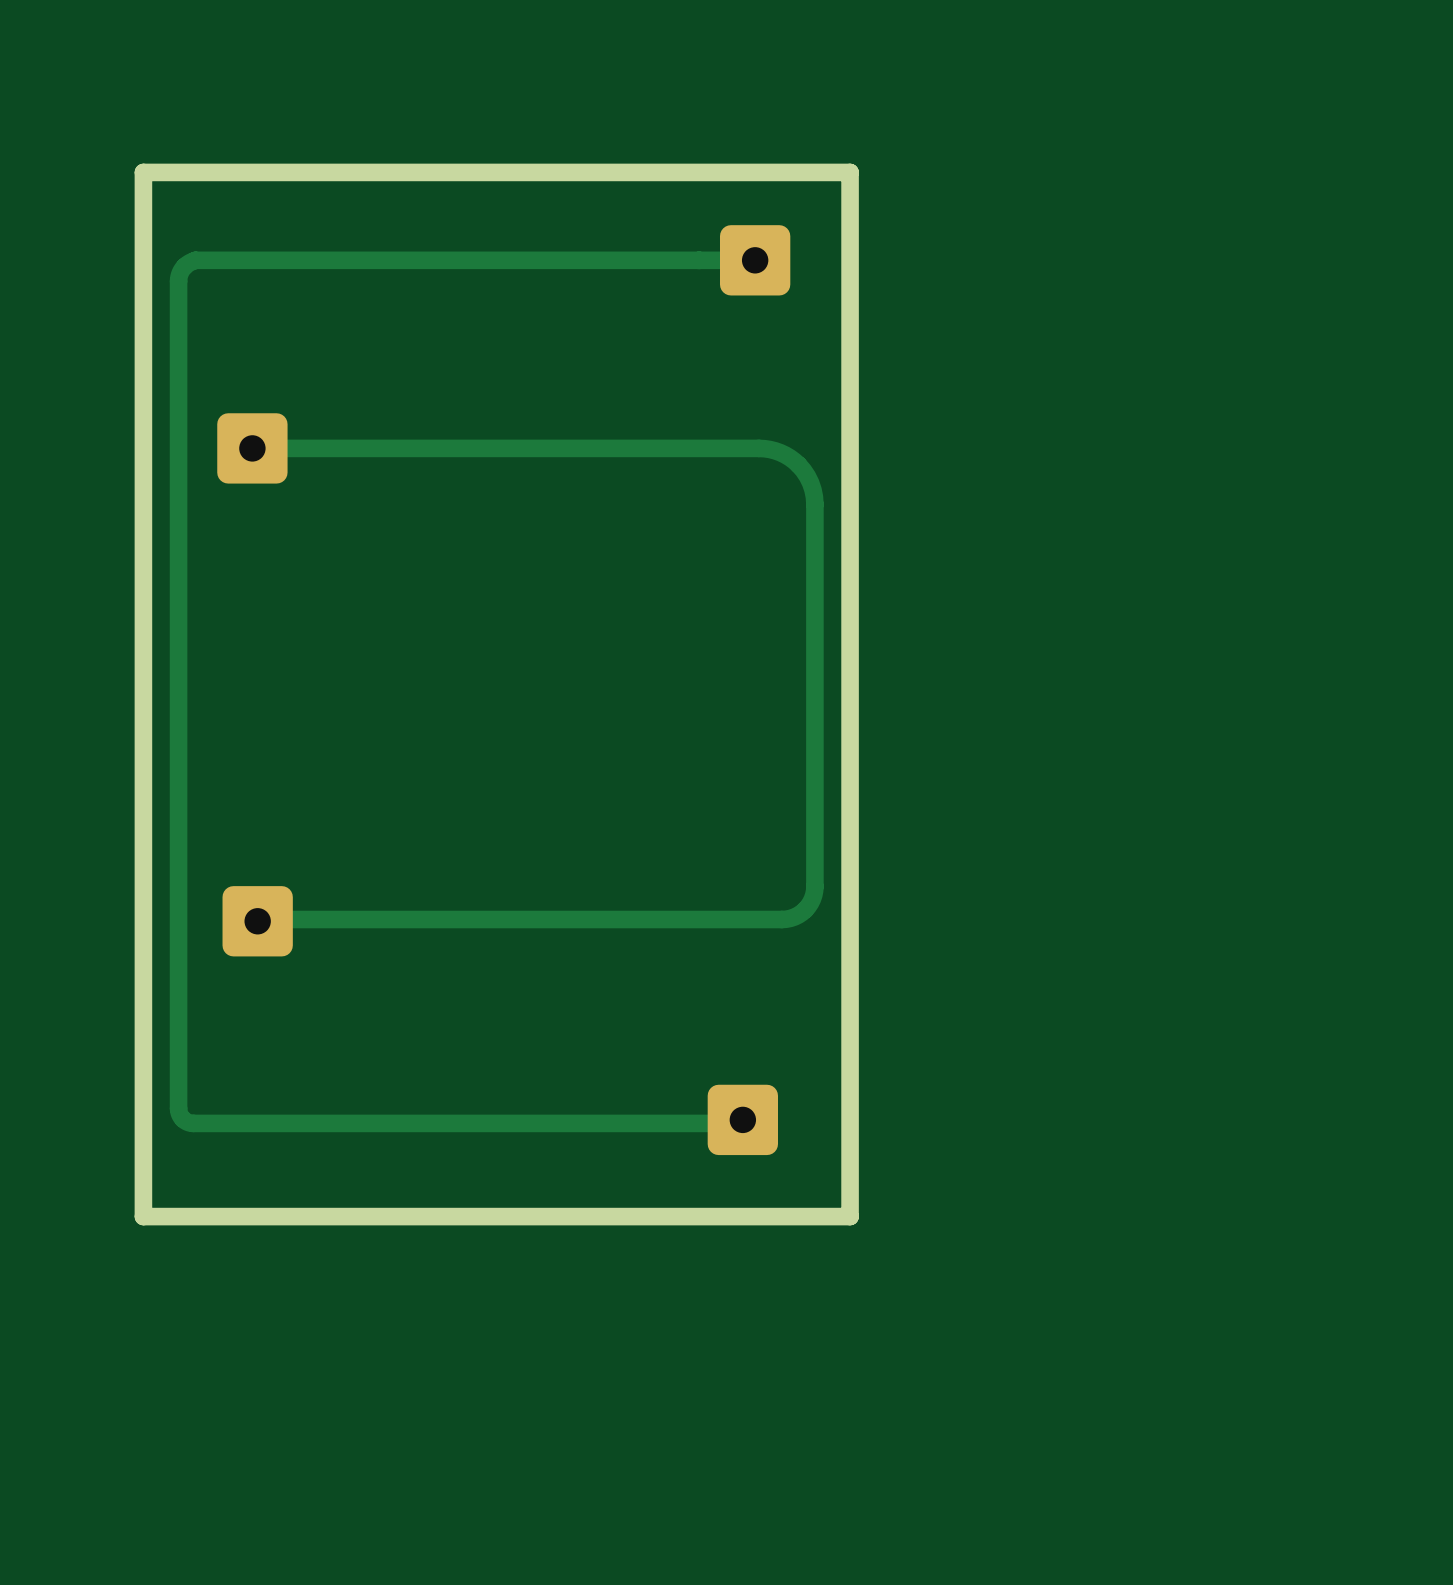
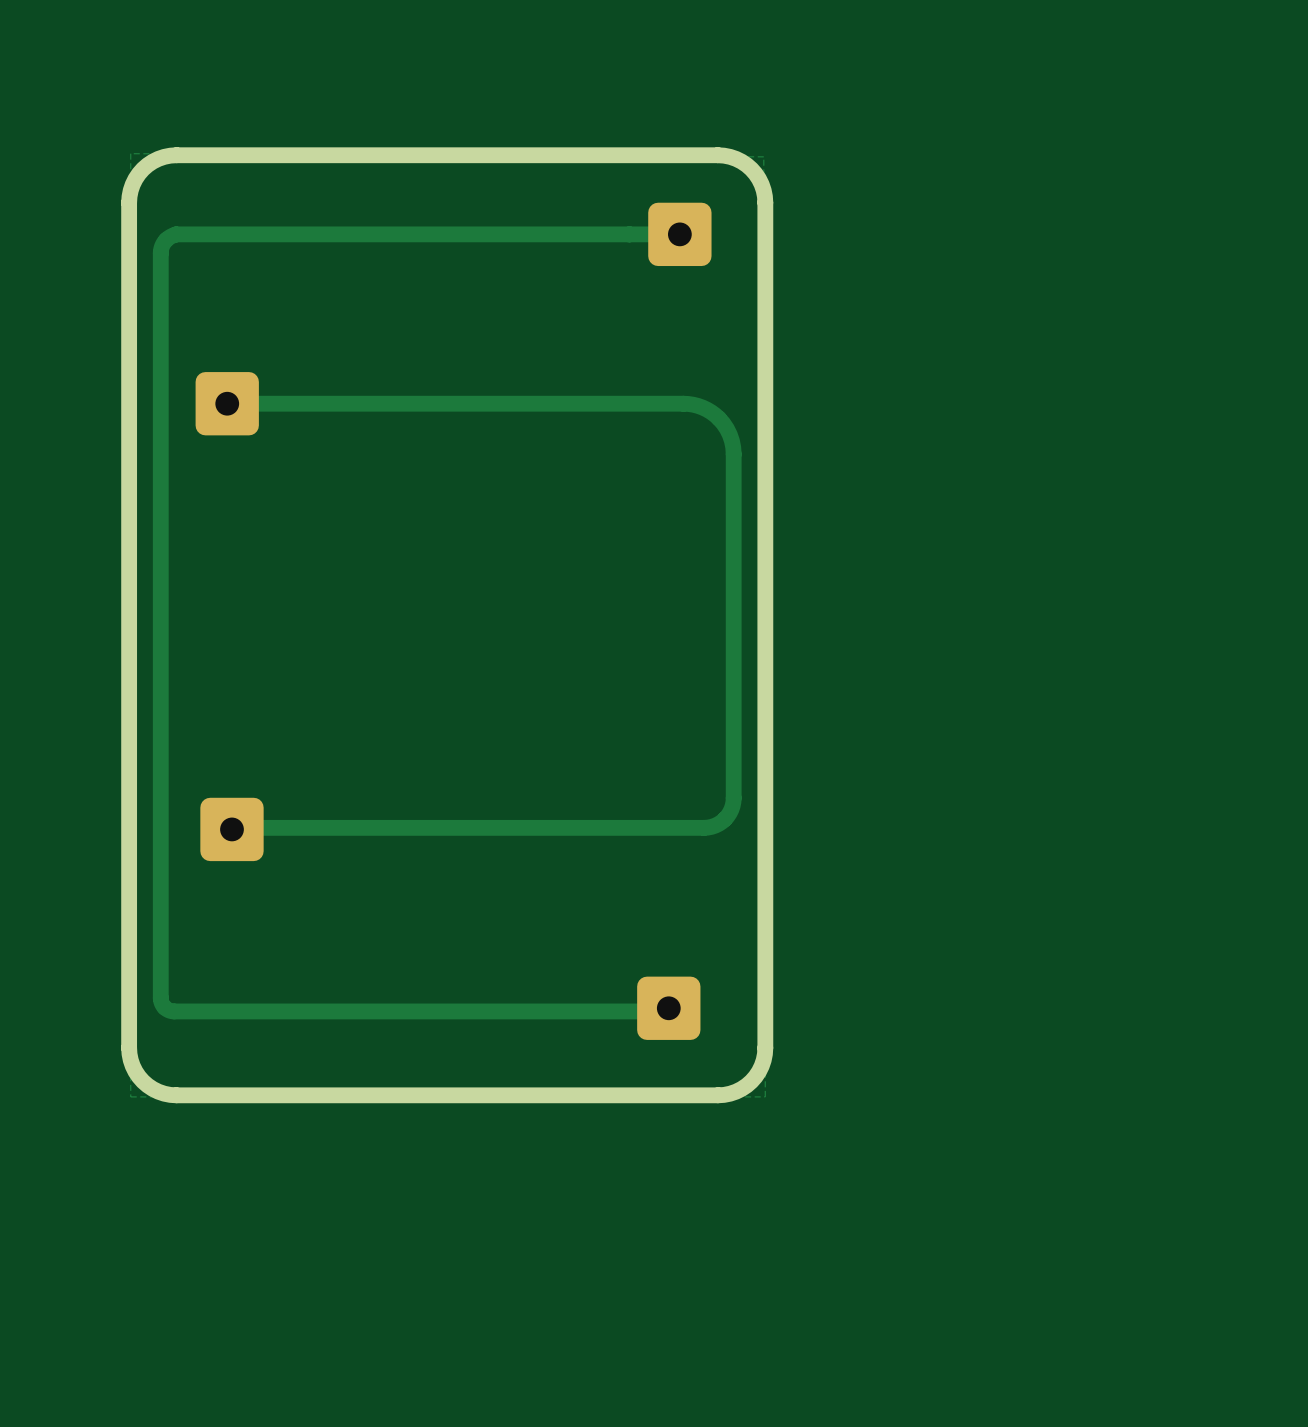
board edge: (196, 172) (143, 172) (143, 225) -> (176, 155) (158, 158) (143, 169) (132, 184) (129, 202)
board edge: (797, 172) (850, 172) (850, 225) -> (717, 155) (736, 158) (751, 169) (761, 184) (765, 202)
board edge: (143, 1163) (143, 1216) (196, 1216) -> (129, 1047) (132, 1066) (143, 1081) (158, 1091) (176, 1095)
board edge: (850, 1163) (850, 1216) (797, 1216) -> (765, 1047) (761, 1066) (751, 1081) (736, 1091) (717, 1095)

